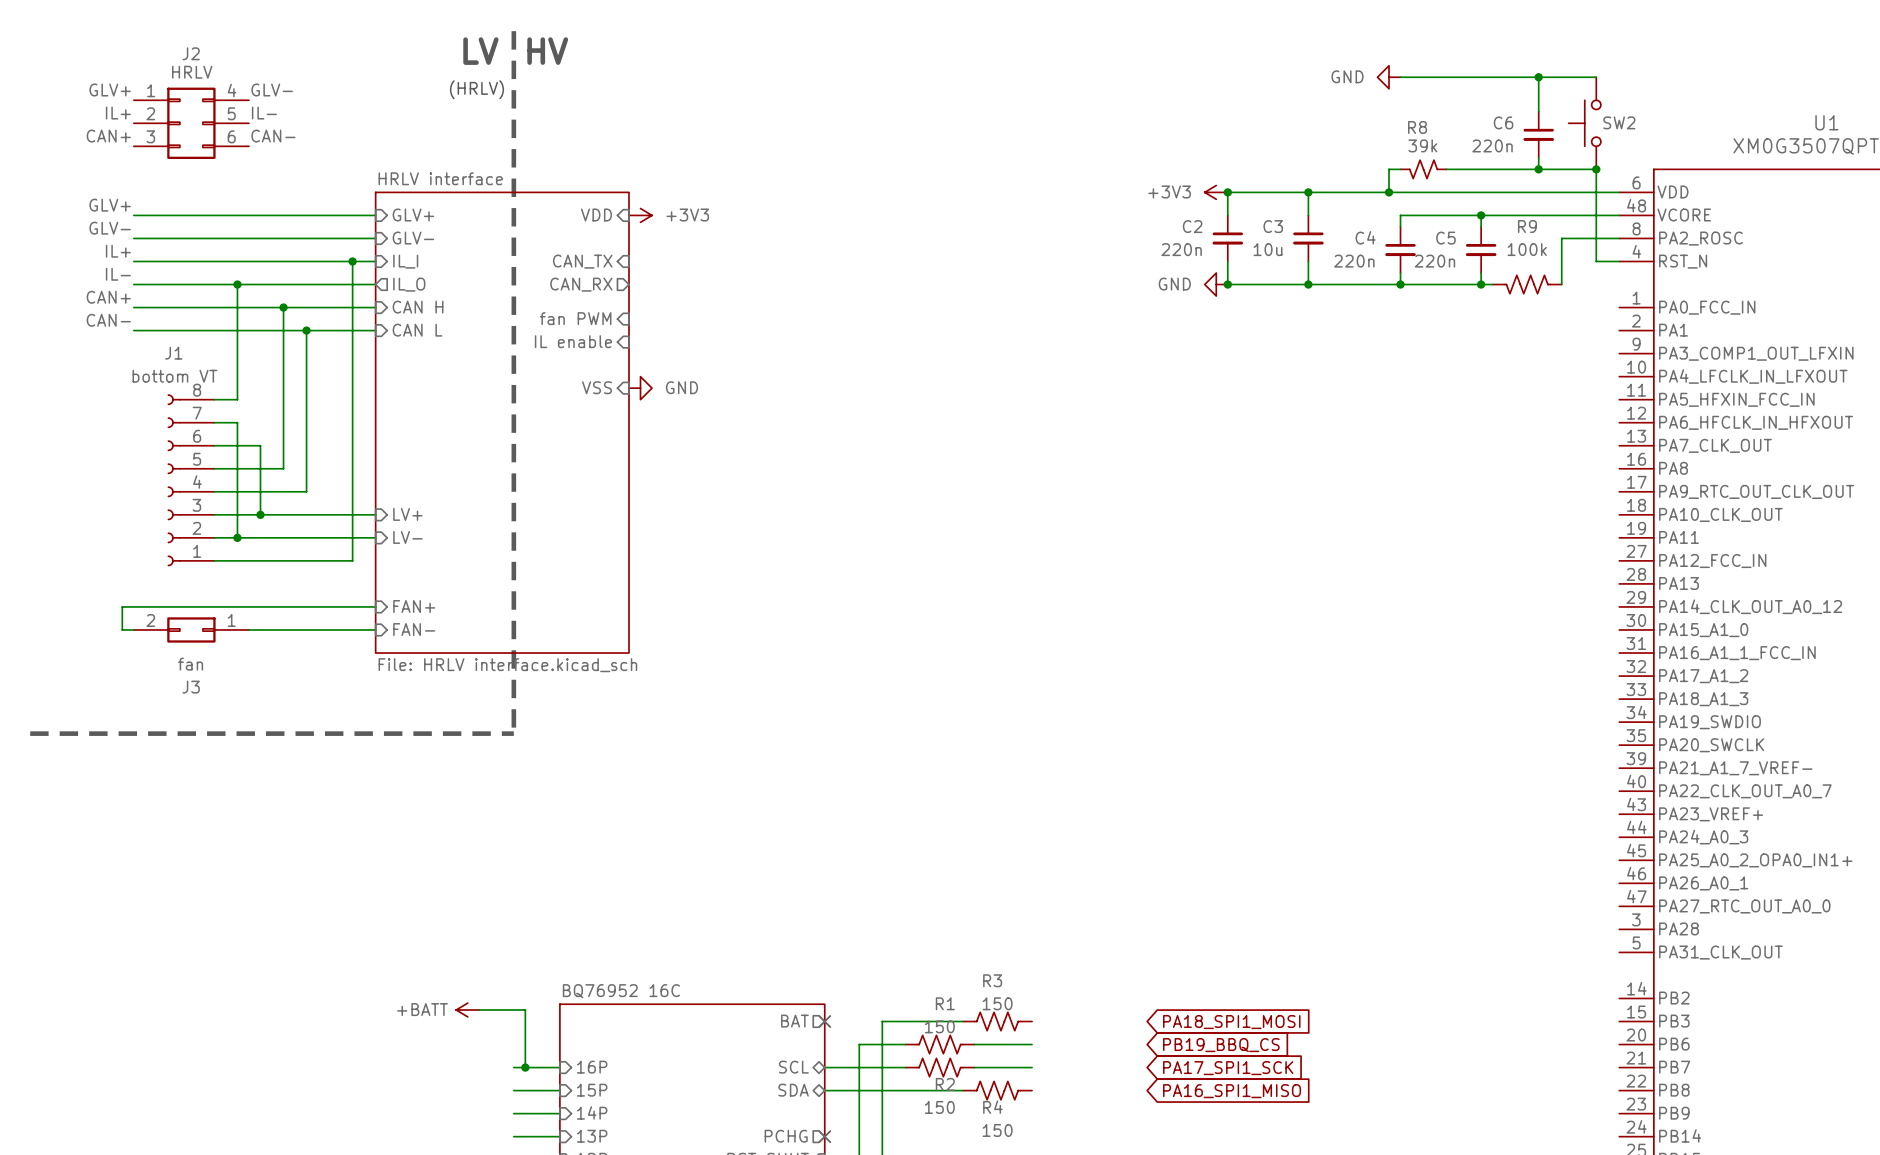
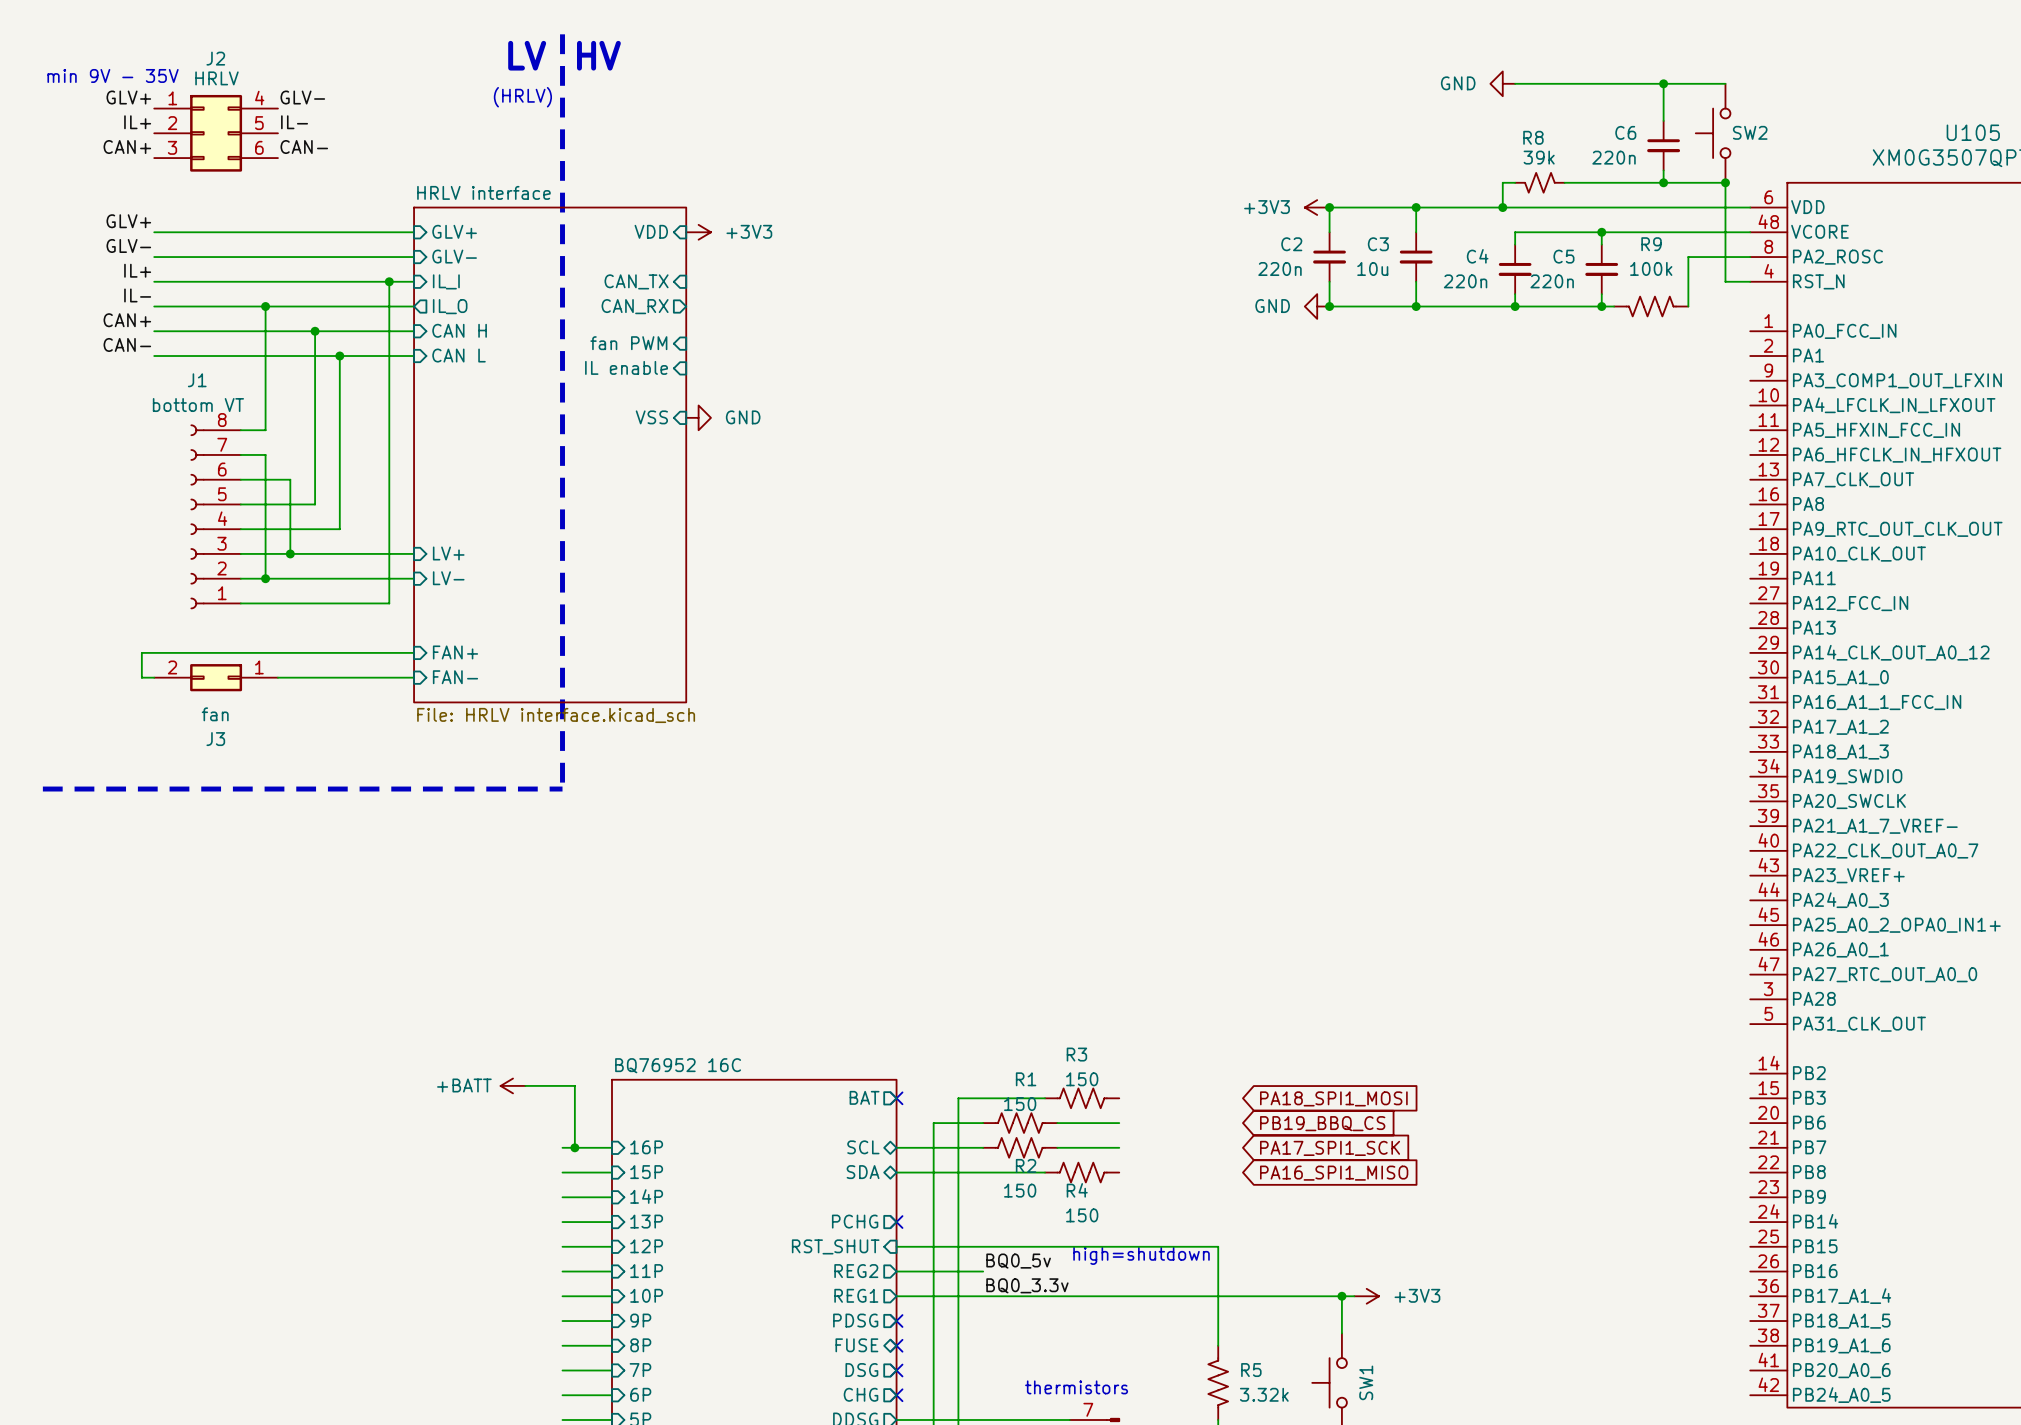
text: none -> min 9V - 35V (113, 75)
U1 name: U1 (1826, 122) -> U105 (1973, 132)

